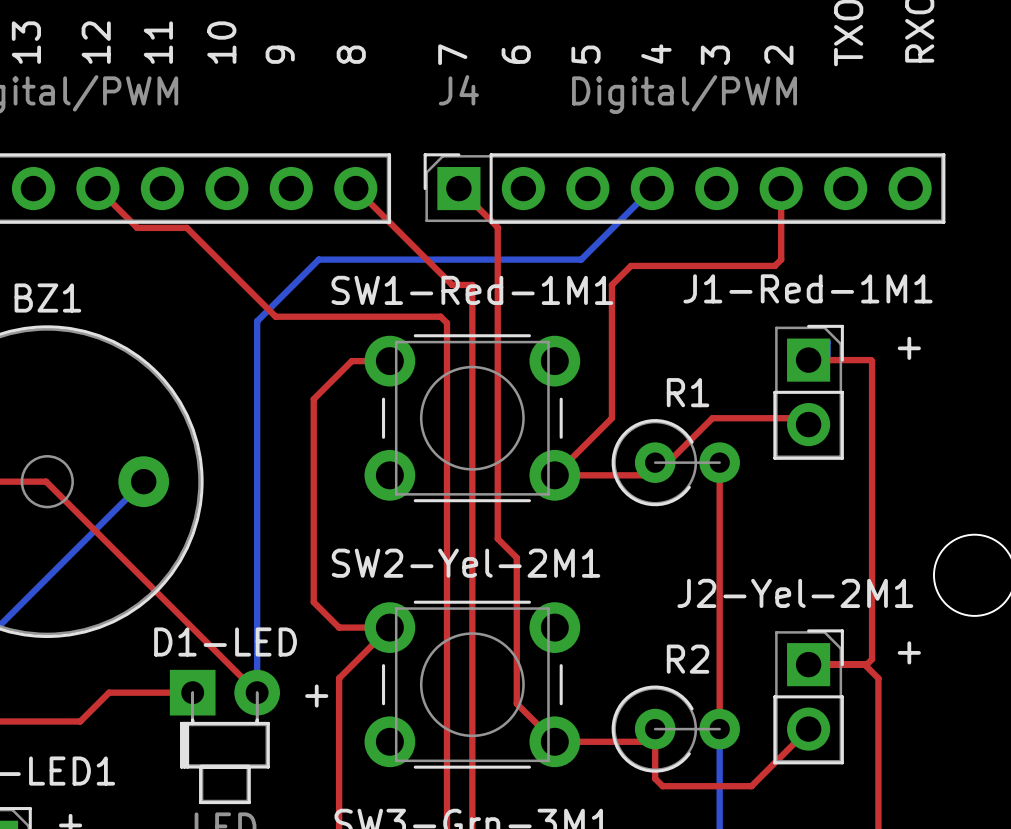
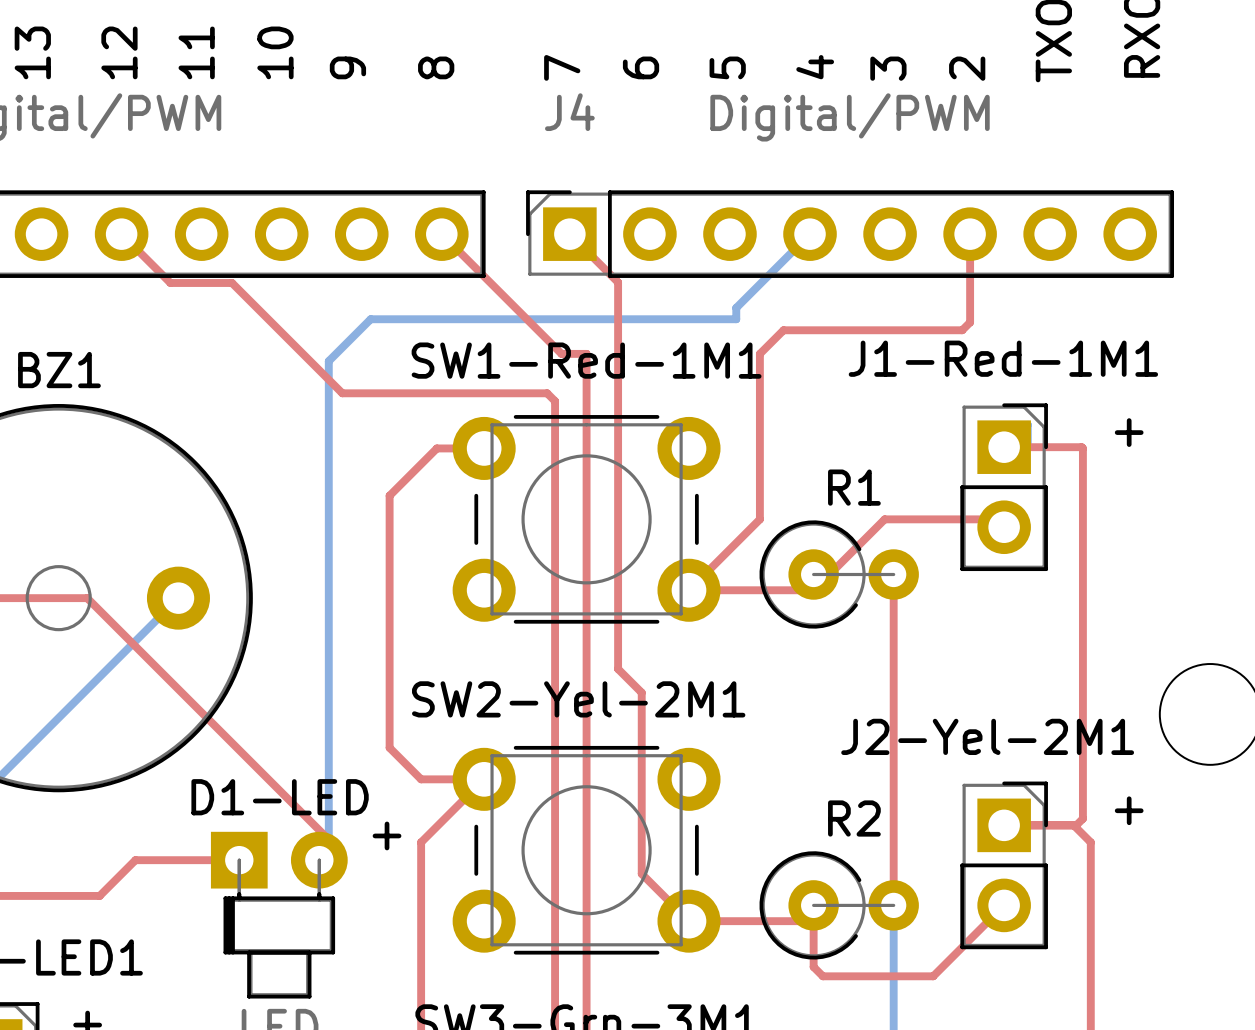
bottom track: (592, 247) (581, 259) (318, 259) (257, 321) (257, 692) -> (736, 307) (736, 319) (370, 319) (328, 361) (328, 839)
top track: (46, 481) (244, 679) -> (57, 598) (87, 598) (328, 839)
text position: + (316, 696) -> + (387, 835)

